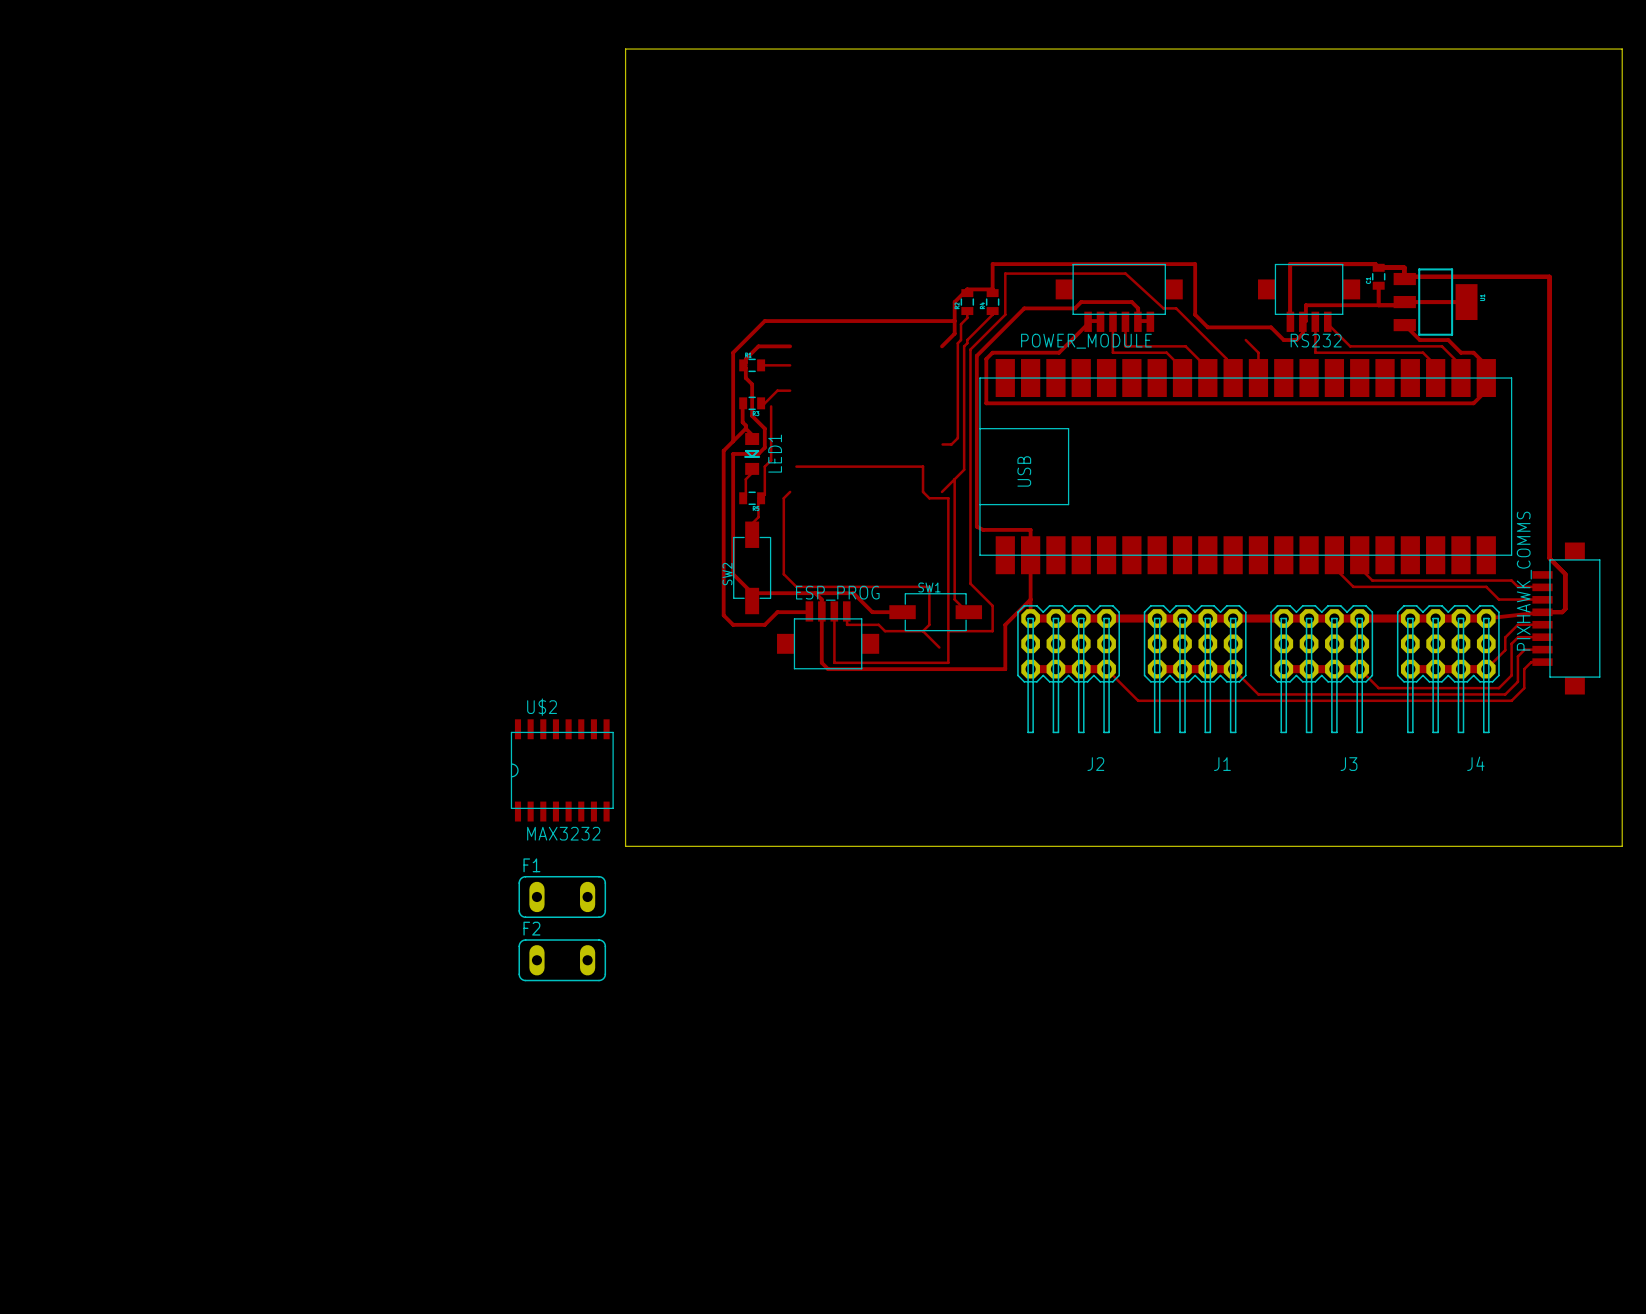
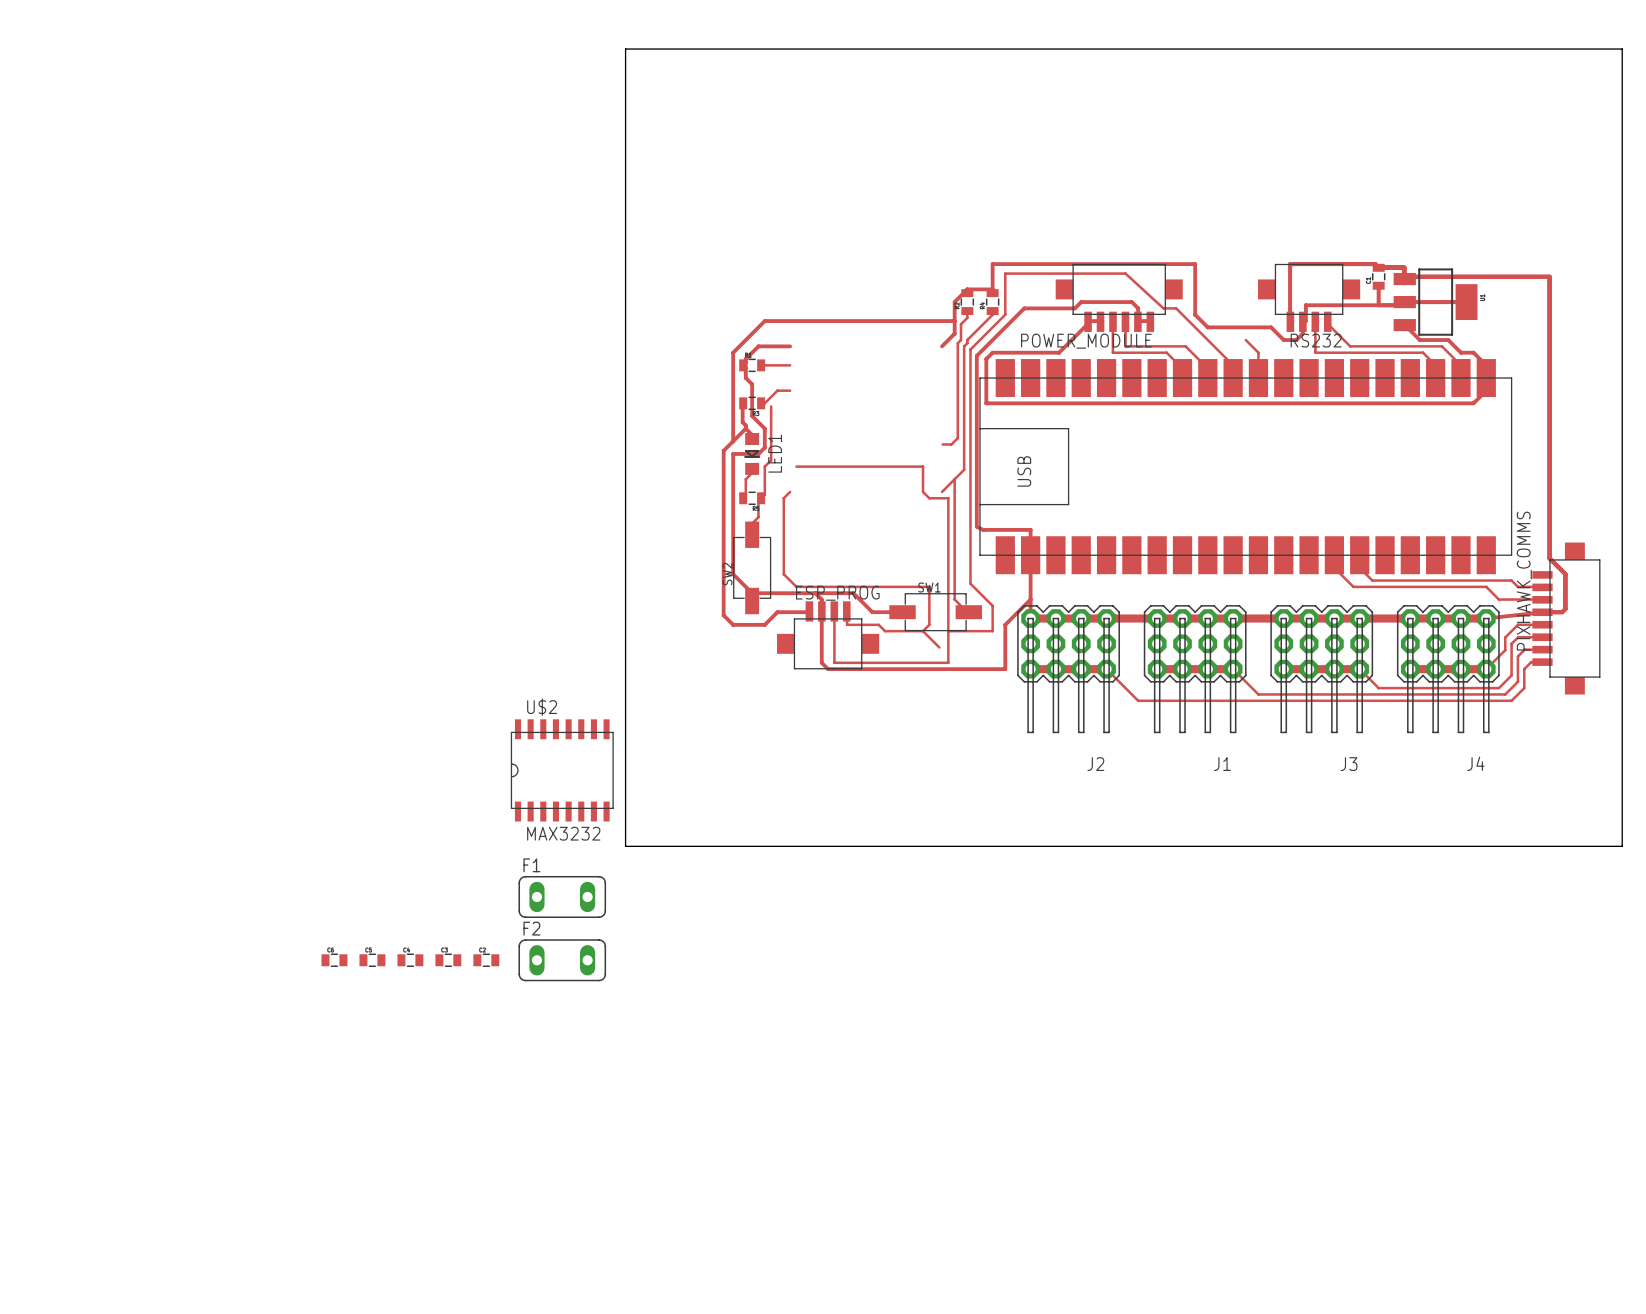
part: none -> (334, 960)
part: none -> (372, 960)
part: none -> (410, 960)
part: none -> (448, 960)
part: none -> (486, 960)

